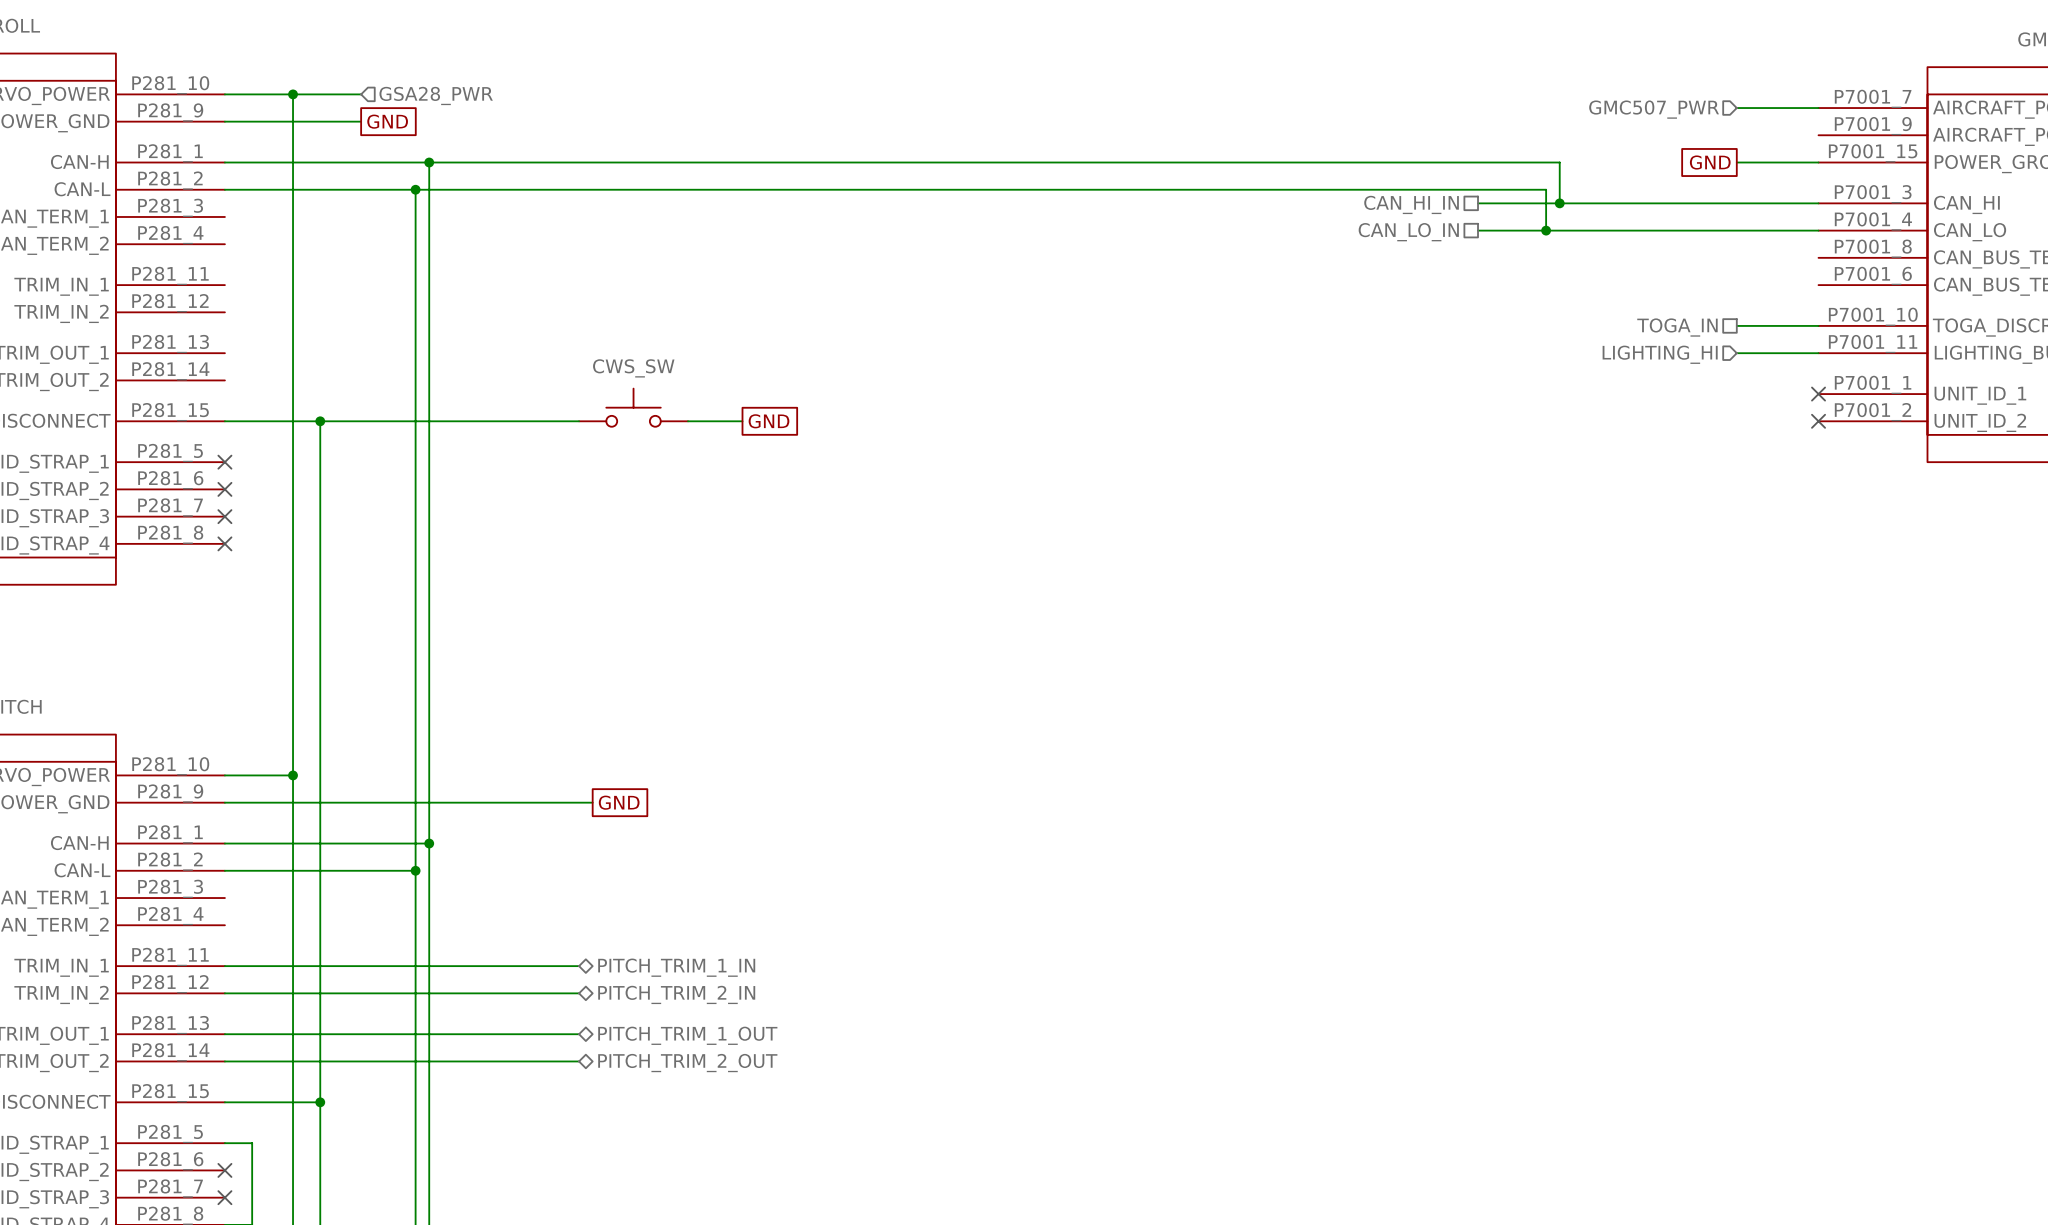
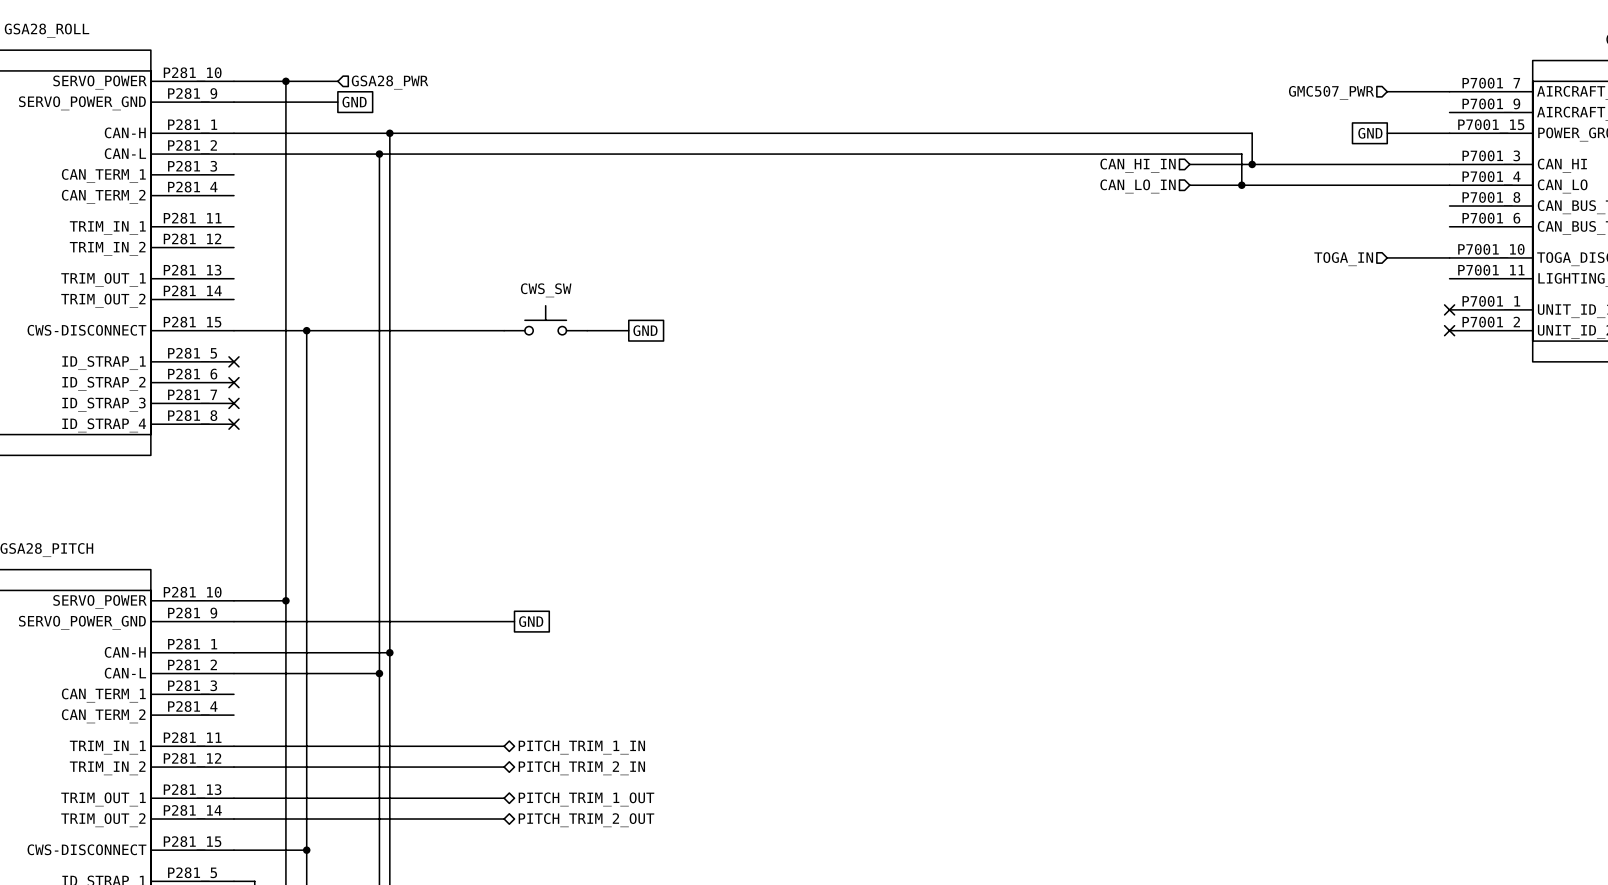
hierarchical label shape: passive (1411, 204) -> input (1138, 165)
hierarchical label shape: passive (1408, 232) -> input (1138, 186)
hierarchical label shape: passive (1677, 327) -> input (1343, 259)
wire: (1736, 353) (1818, 353) -> none
hierarchical label: LIGHTING_HI (1660, 354) -> none

